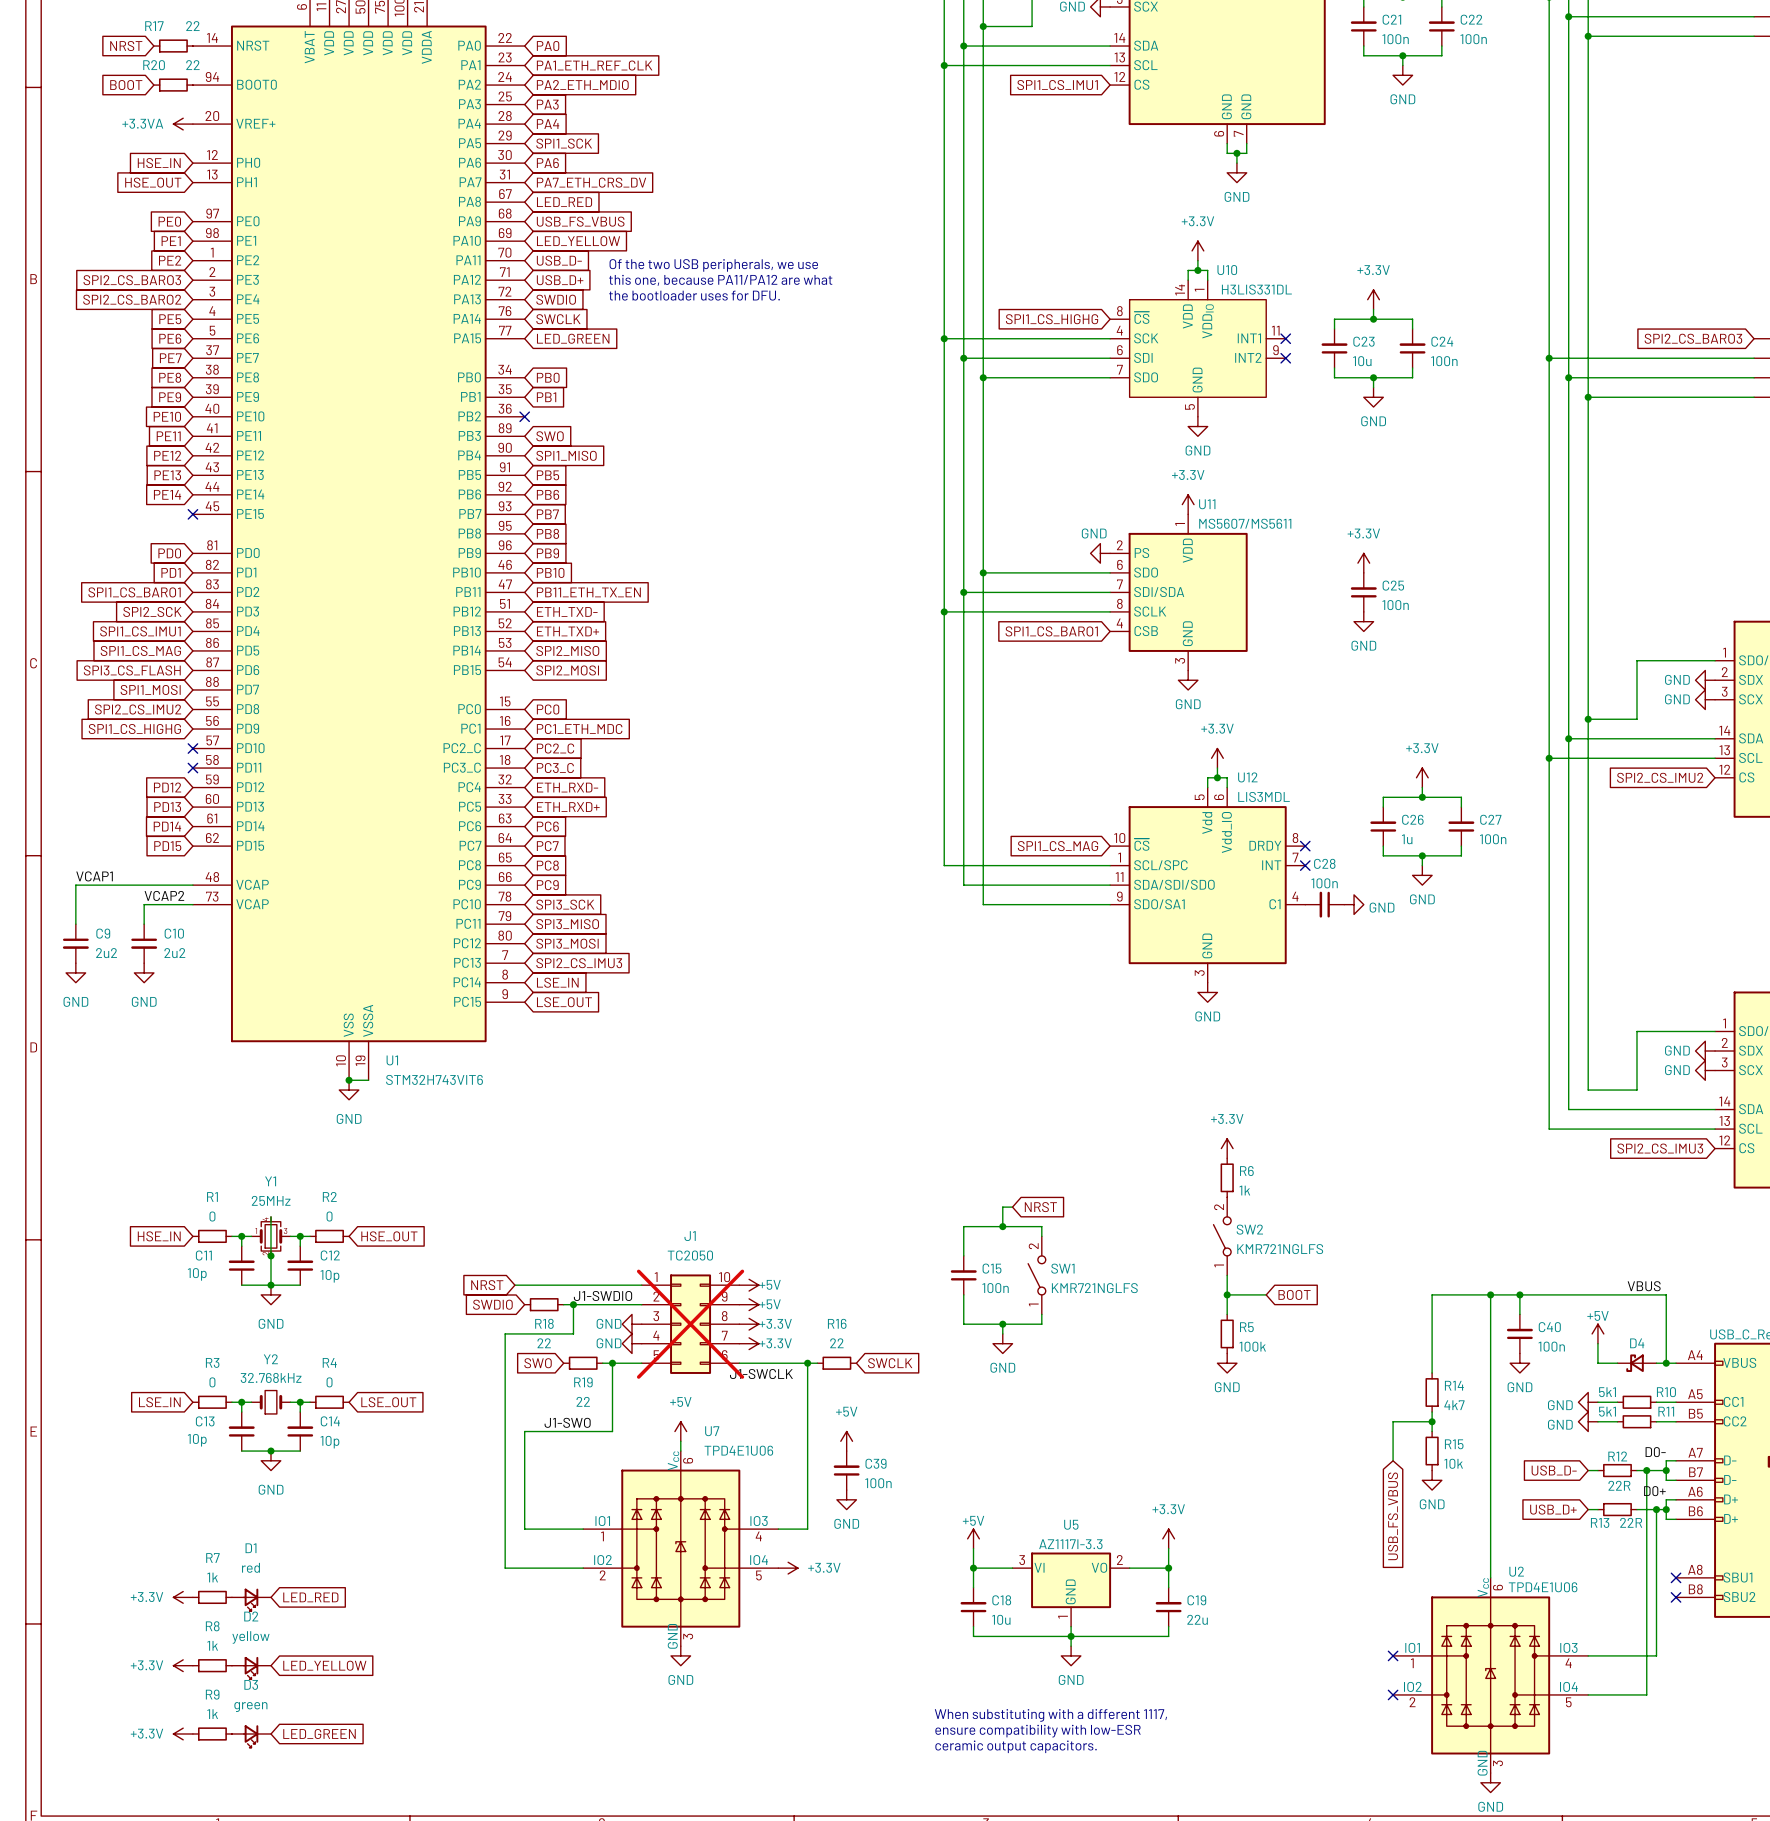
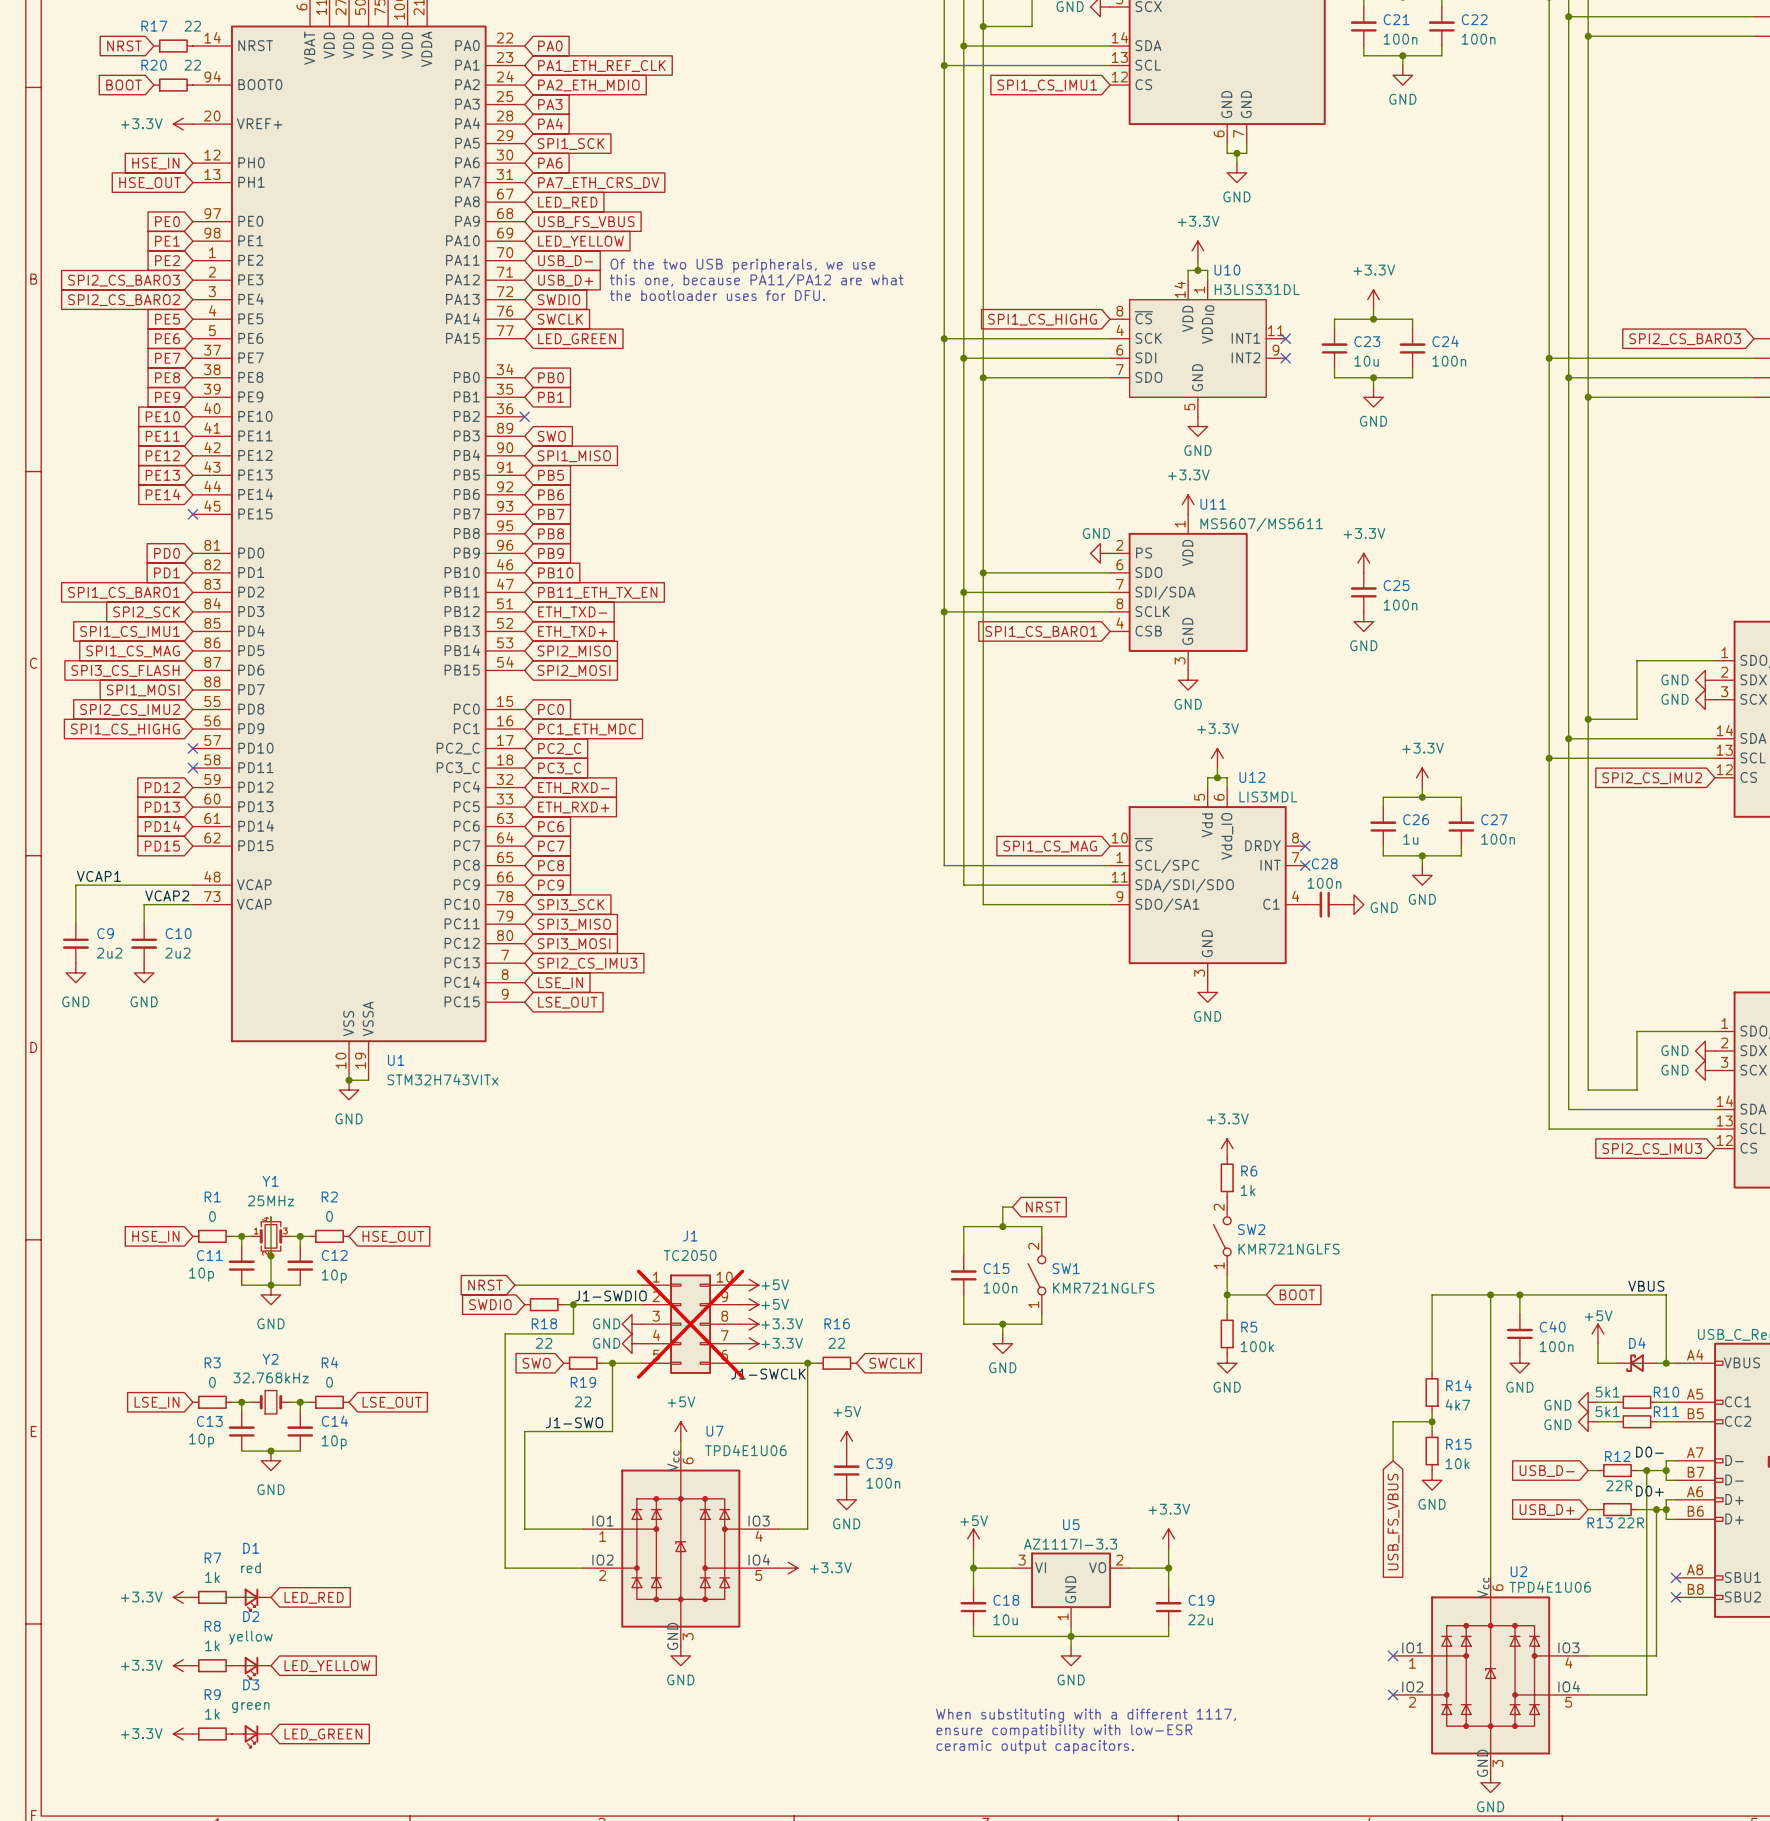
power symbol: +3.3VA (183, 124) -> +3.3V (183, 124)
U1 value: STM32H743VIT6 (434, 1079) -> STM32H743VITx (442, 1079)

